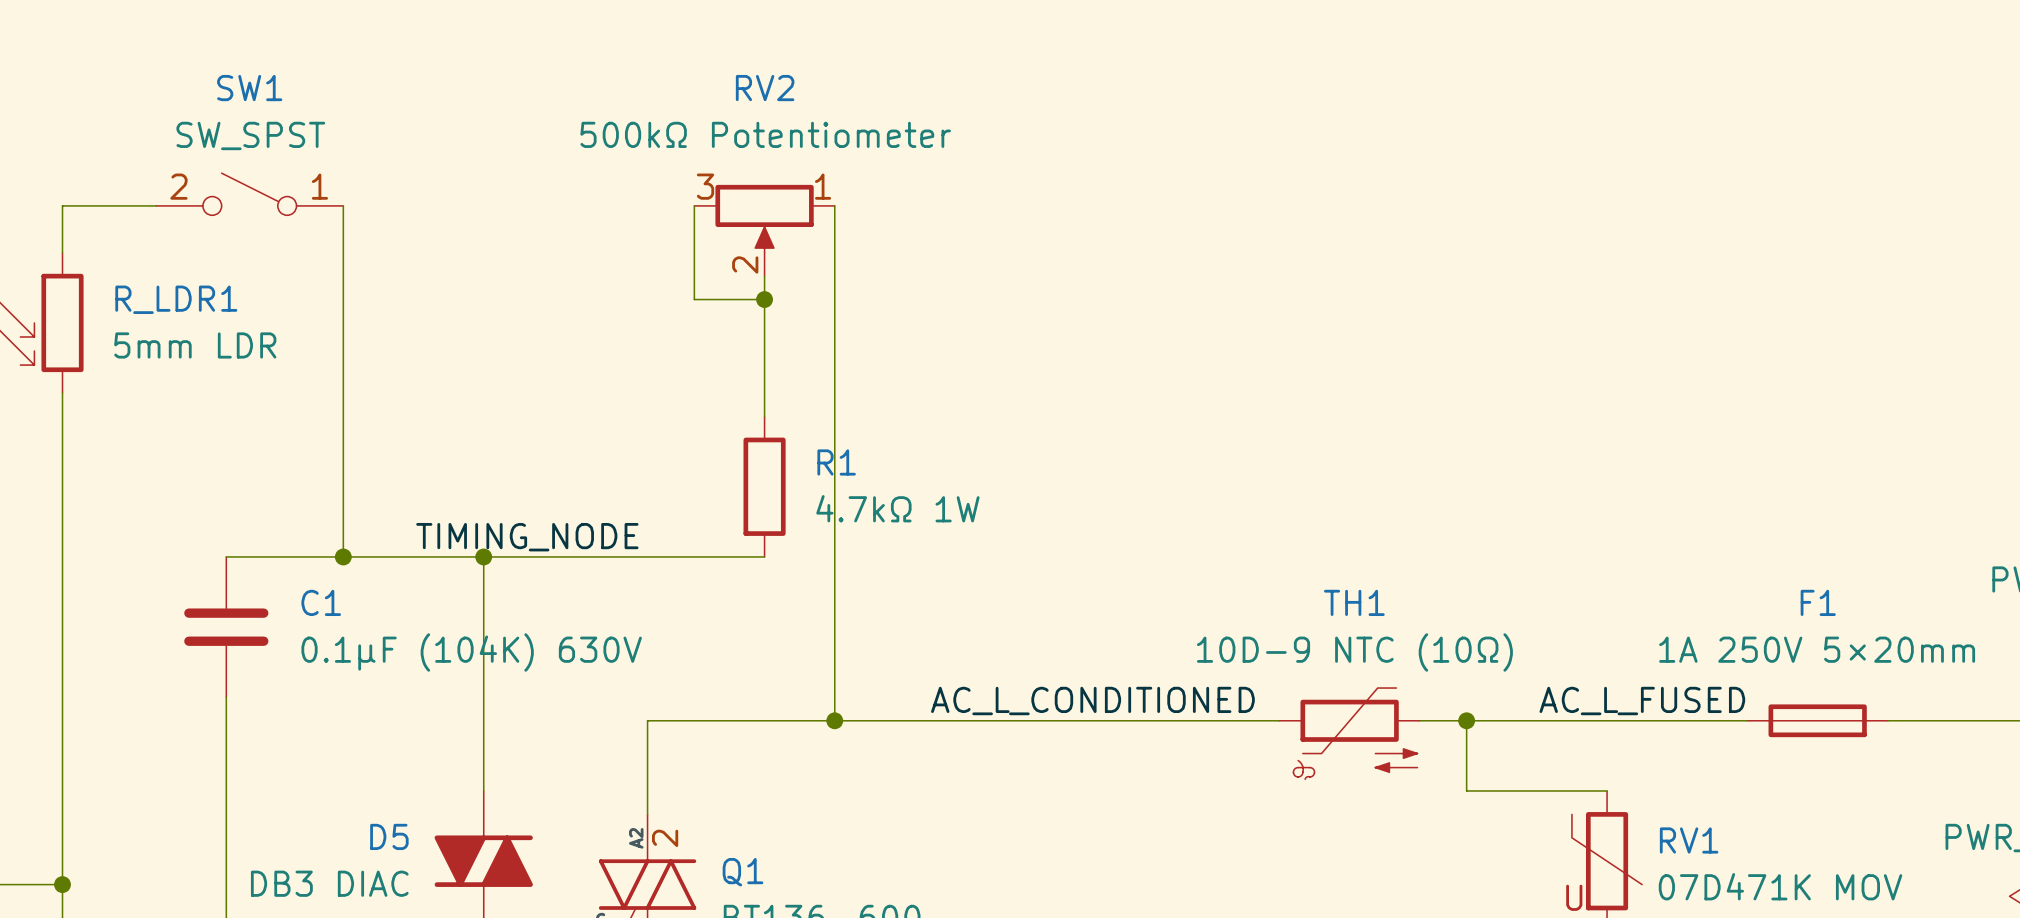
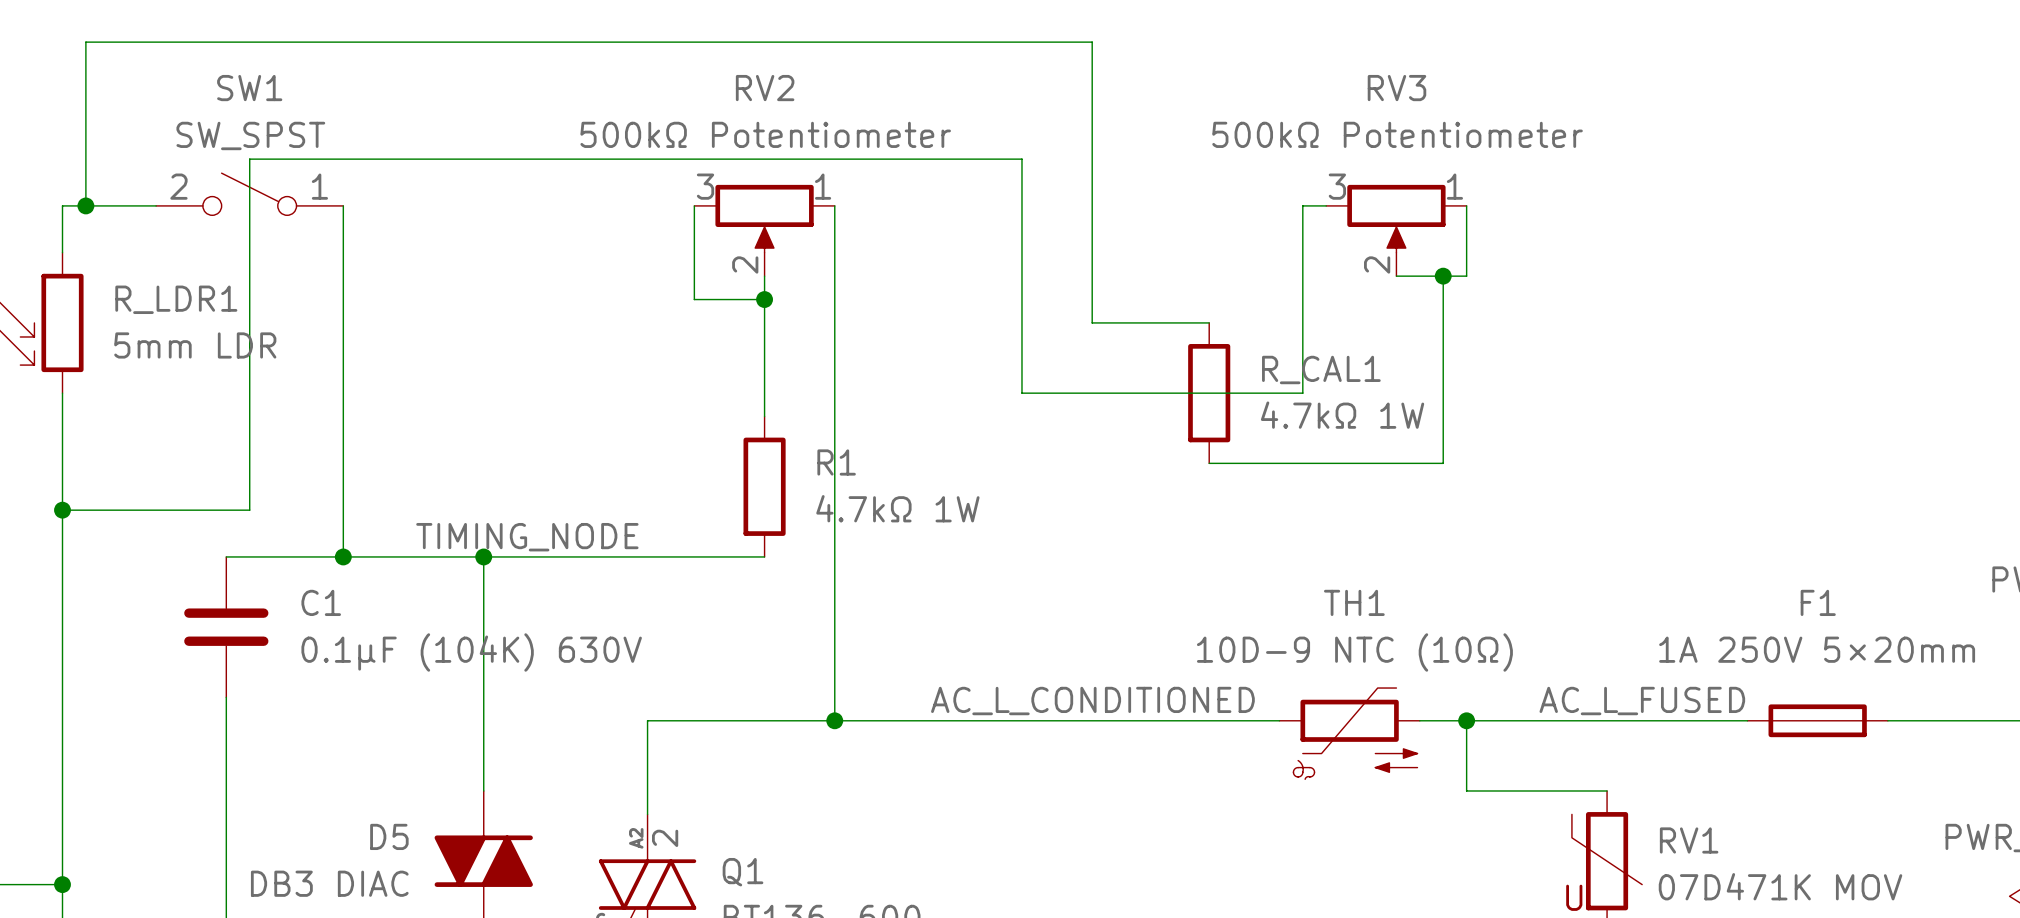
wire: none -> (85, 205) (85, 42) (1092, 42) (1092, 322) (1209, 322)
junction: none -> (85, 205)
wire: none -> (1326, 205) (1302, 205) (1302, 393) (1021, 393) (1021, 159) (249, 159) (249, 510) (62, 510)
wire: none -> (1466, 205) (1466, 276) (1396, 276)
RV3: none -> 500kΩ Potentiometer (1396, 230)
wire: none -> (1443, 276) (1443, 463) (1209, 463)
junction: none -> (1443, 276)
R_CAL1: none -> 4.7kΩ 1W (1209, 393)
junction: none -> (62, 510)

